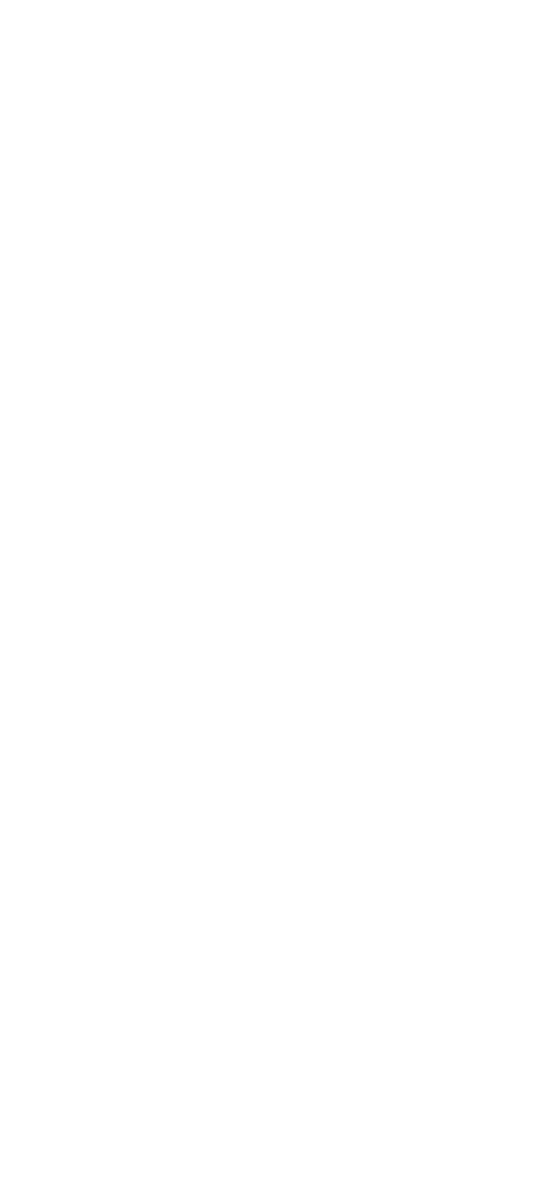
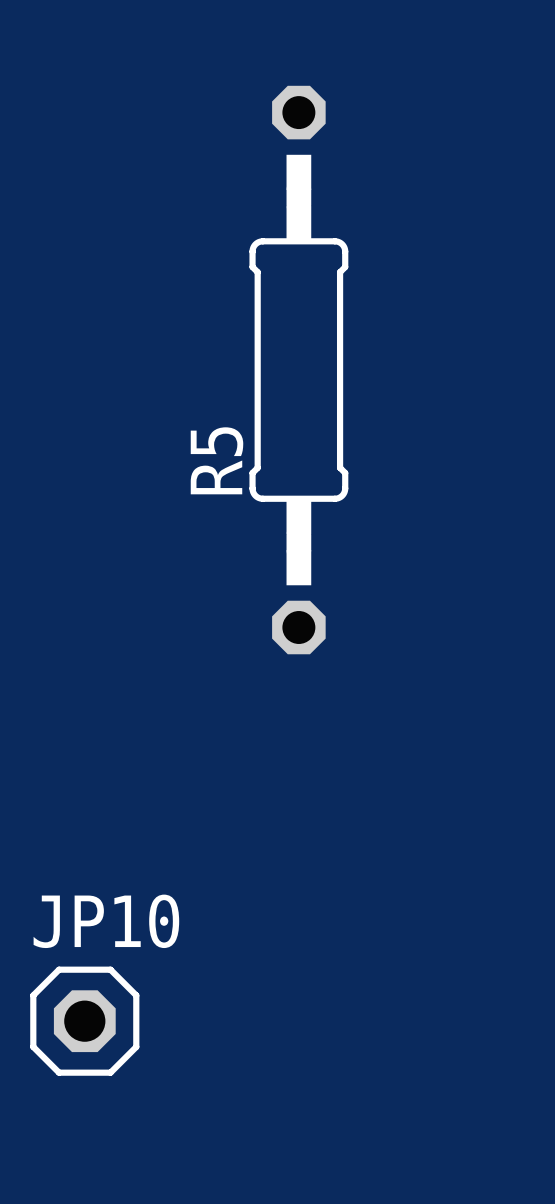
R5: none -> (298, 370)
JP10: none -> (84, 1021)

